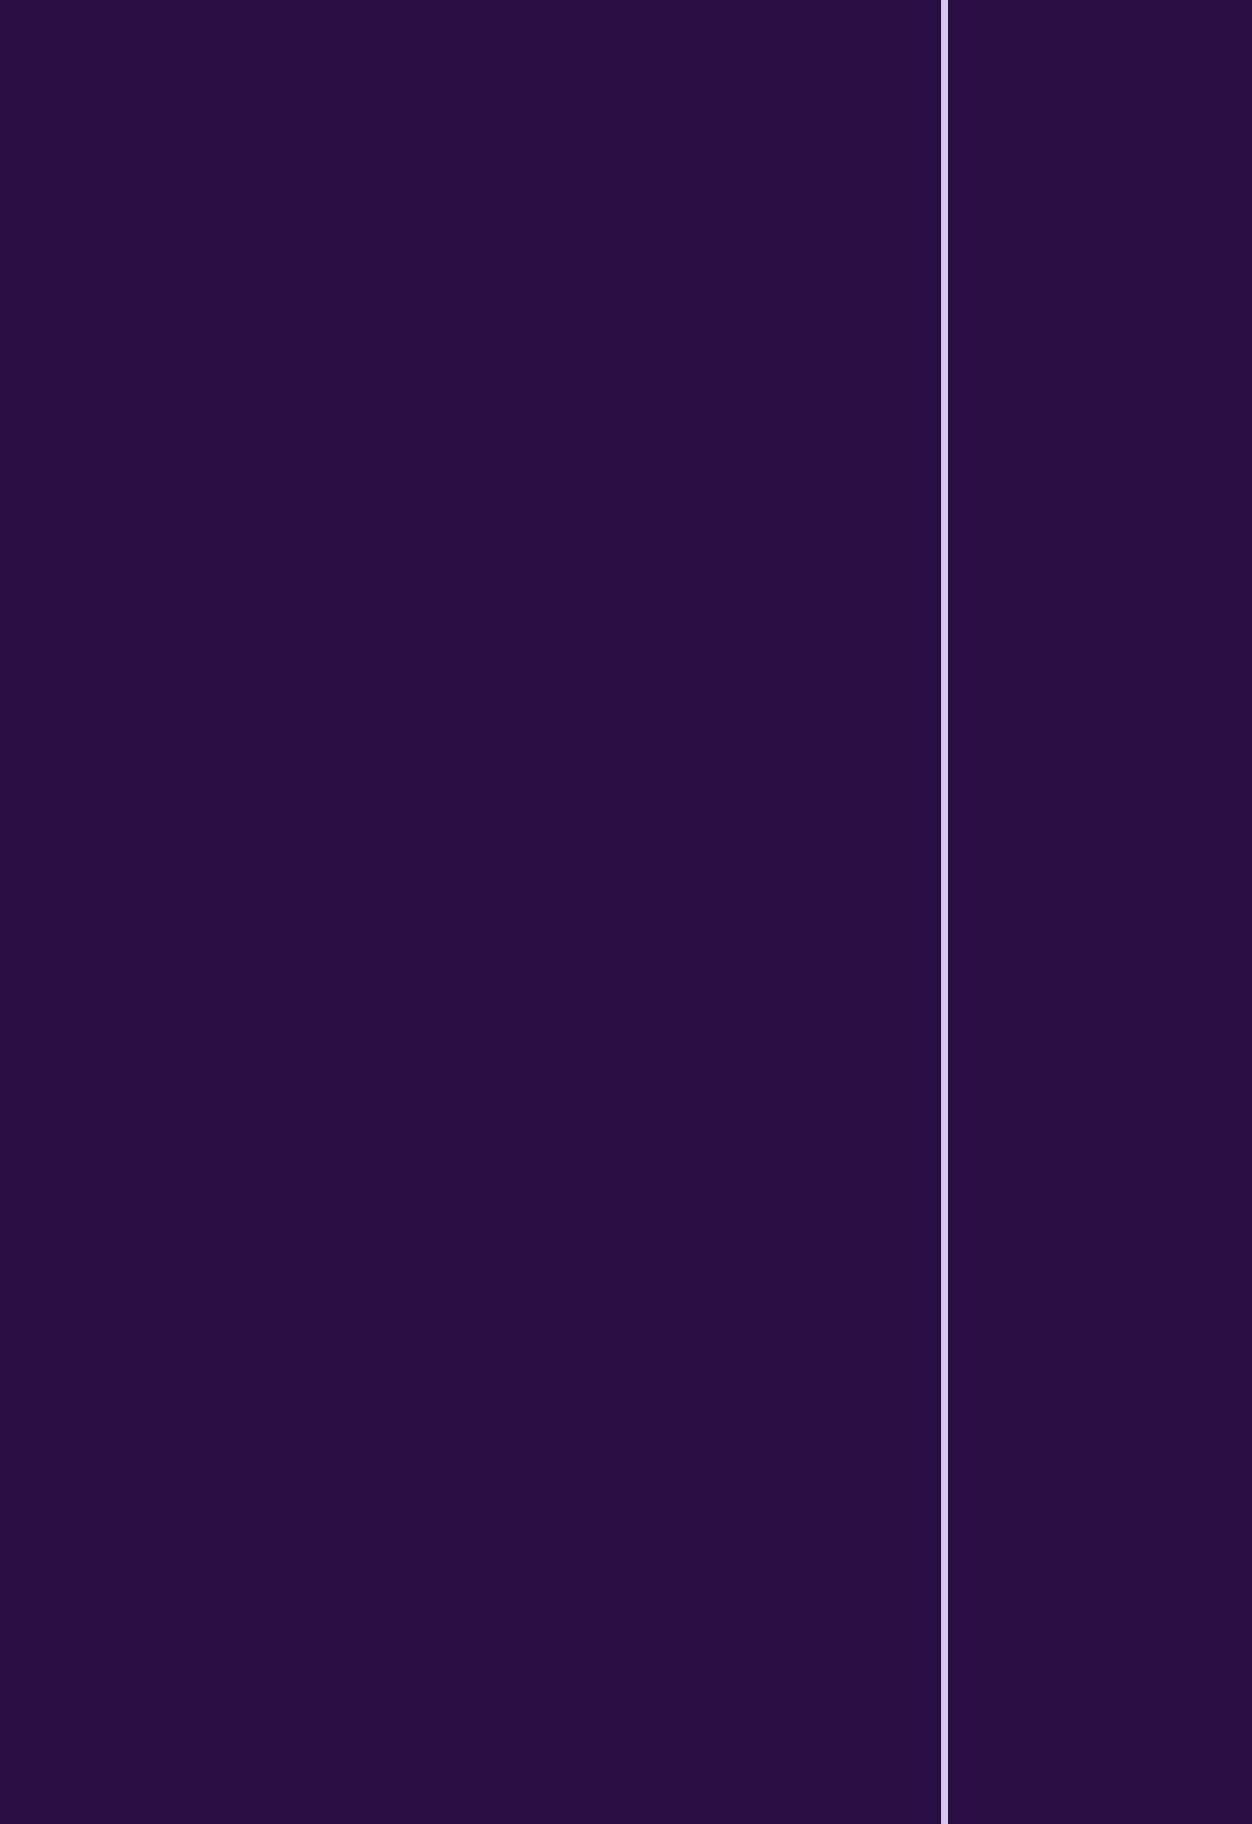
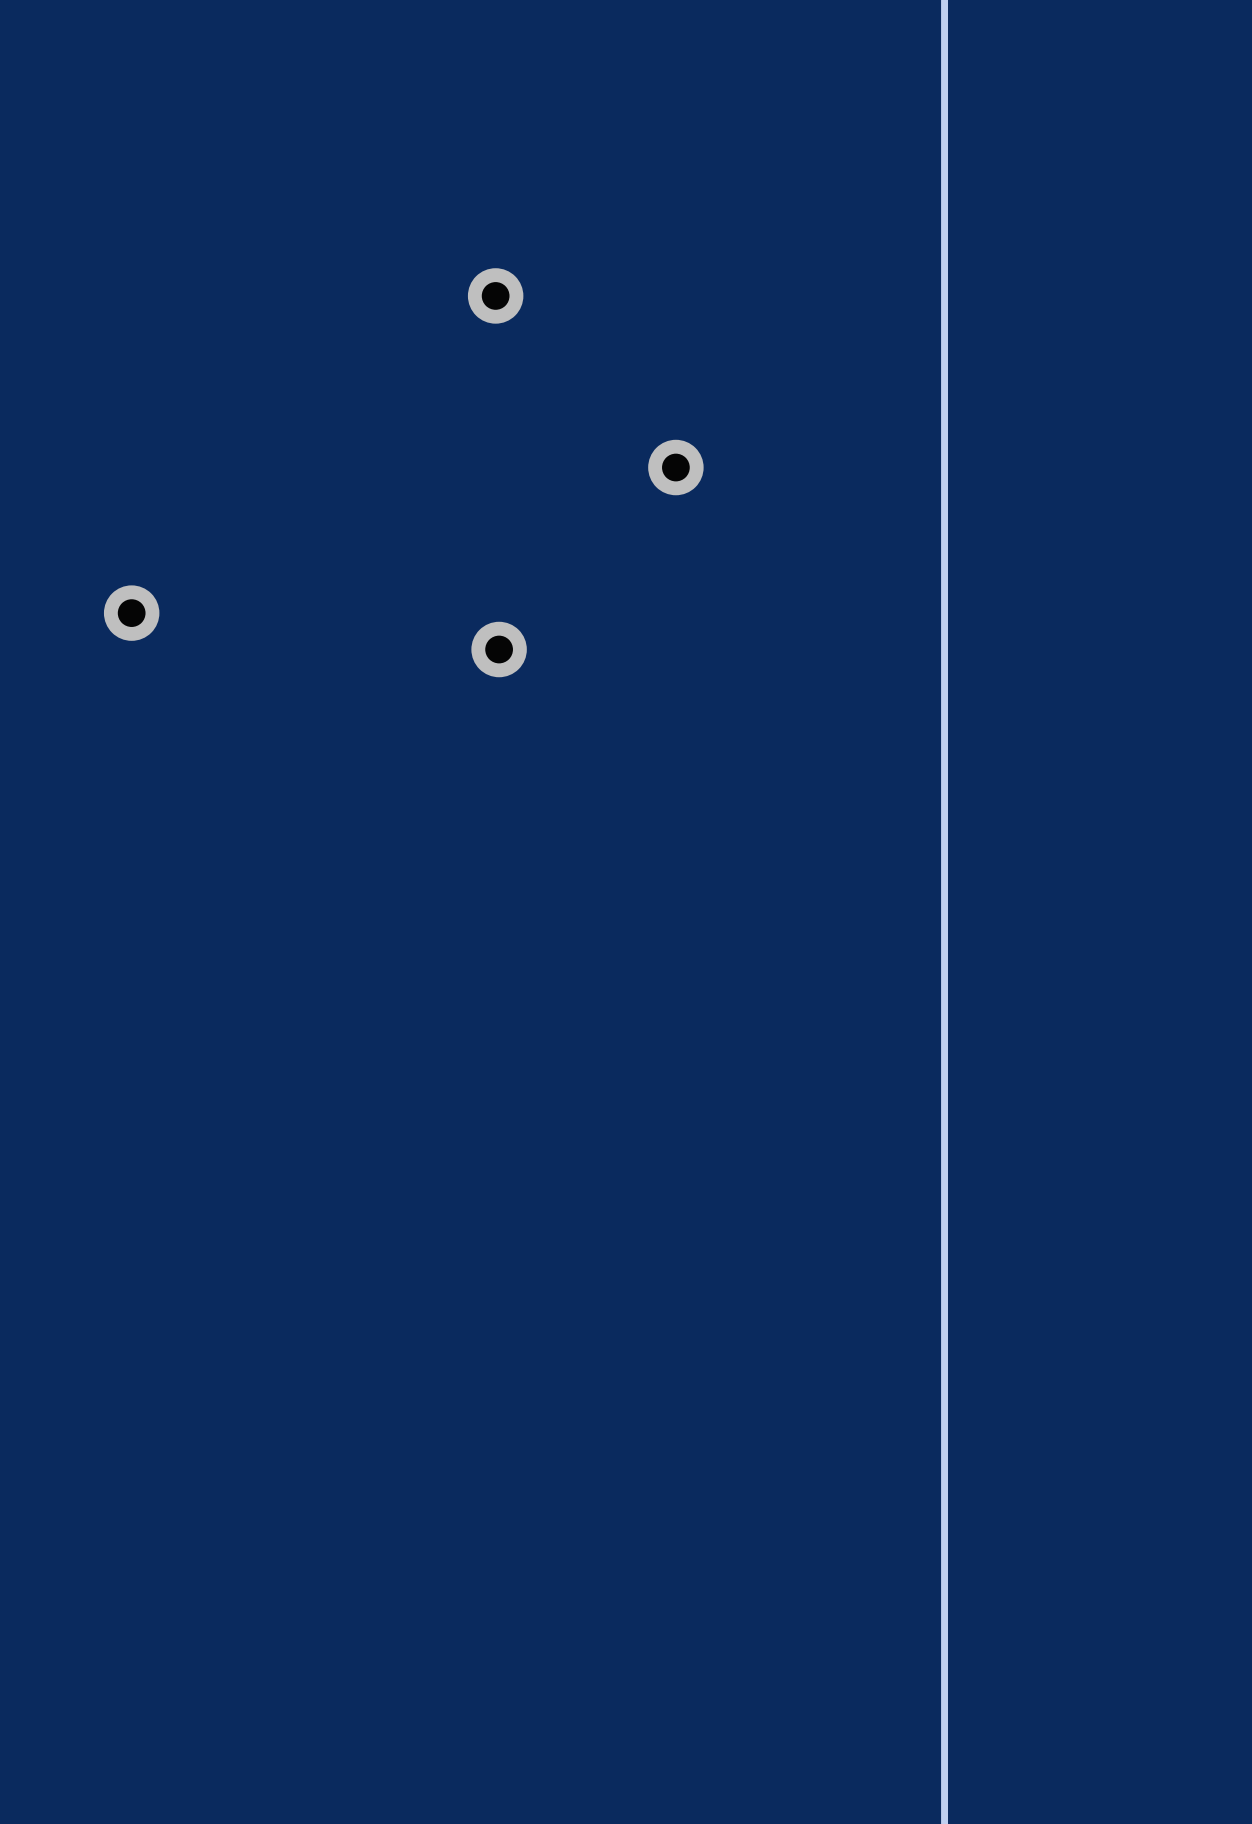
via: none -> (495, 295)
via: none -> (675, 467)
via: none -> (131, 613)
via: none -> (499, 649)

